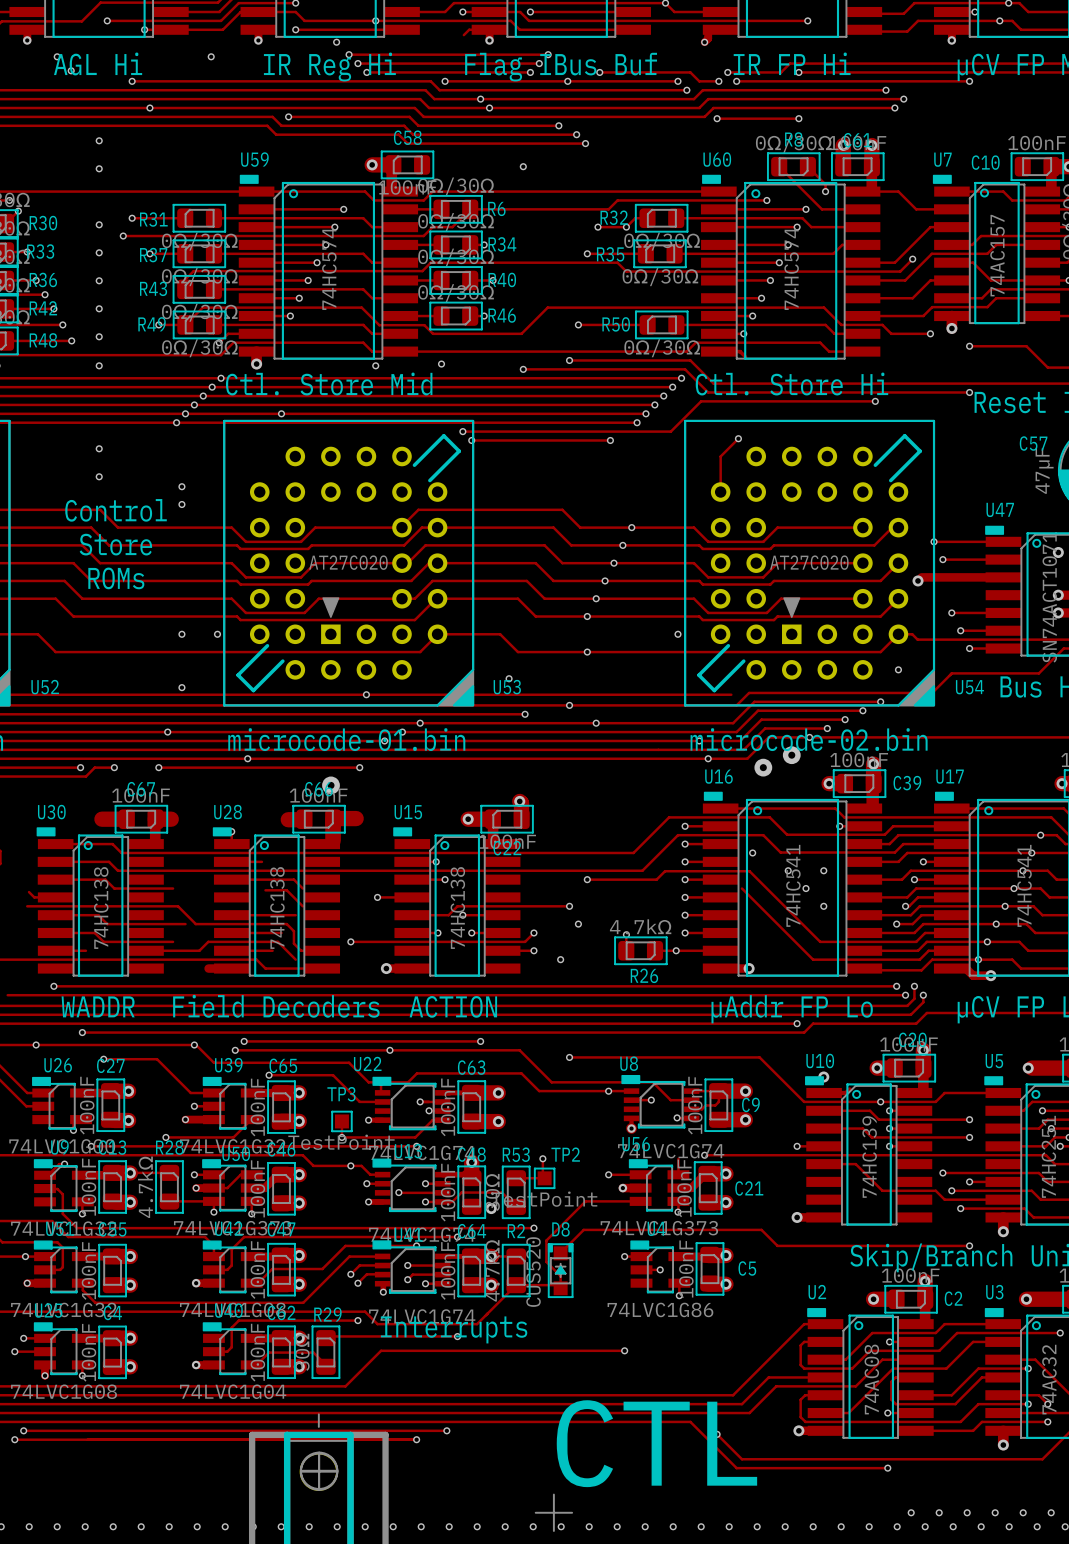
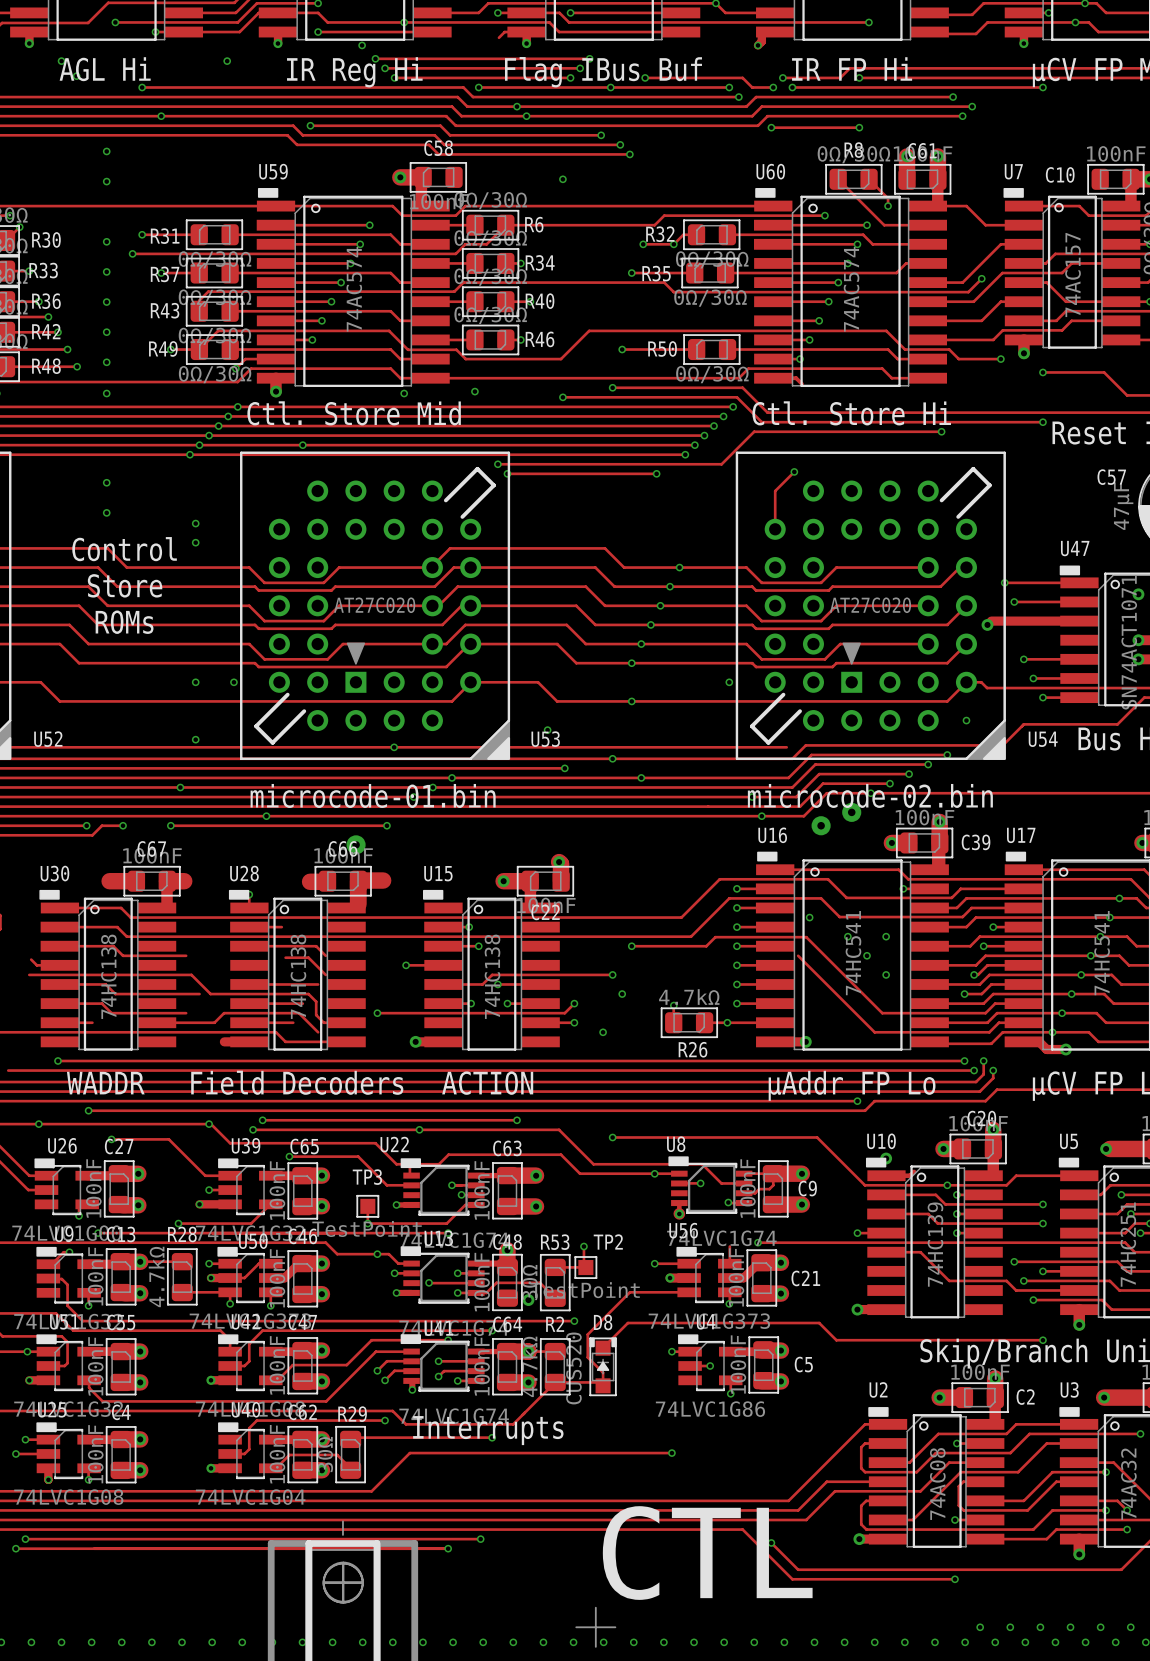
U59 value: 74HC574 (329, 268) -> 74AC574 (354, 289)
U60 value: 74HC574 (791, 268) -> 74AC574 (851, 289)

